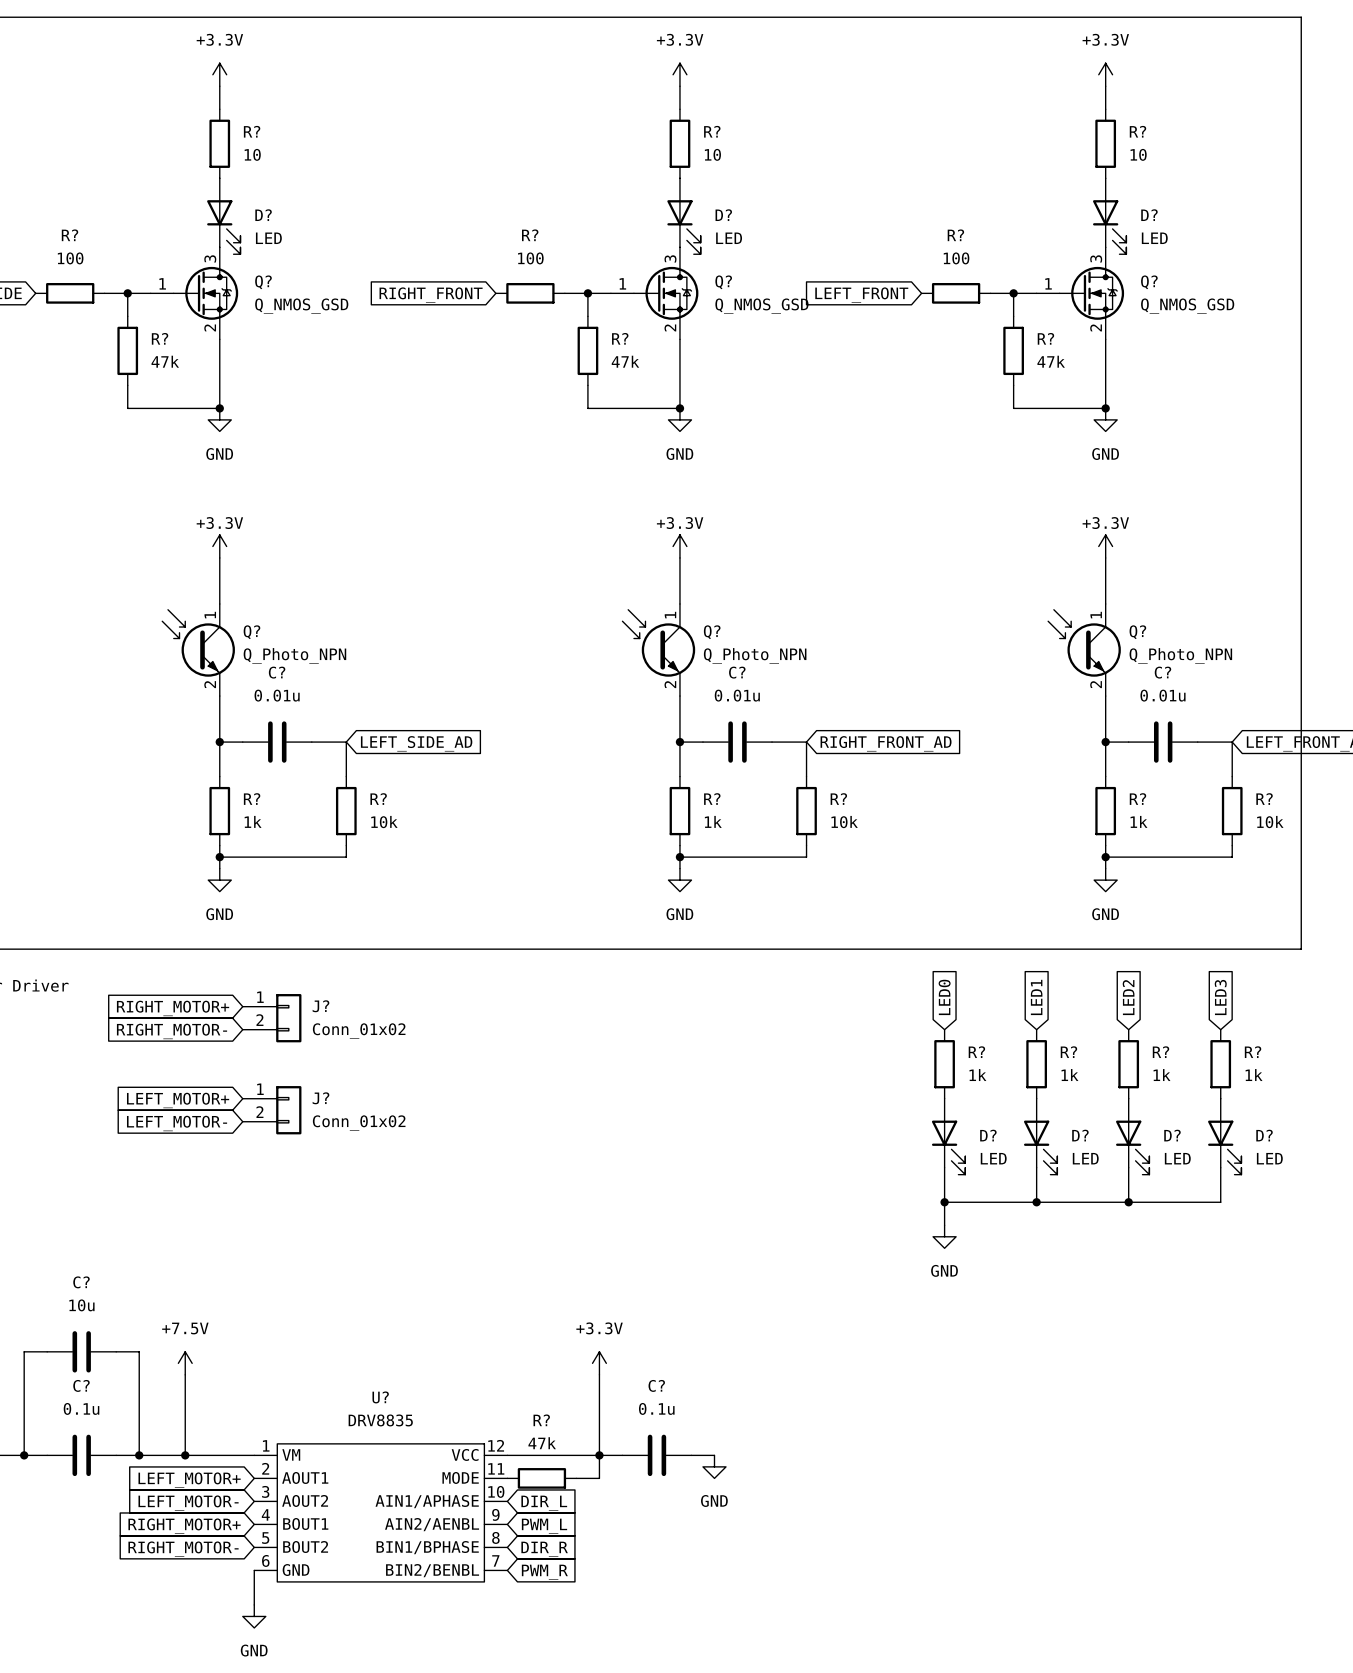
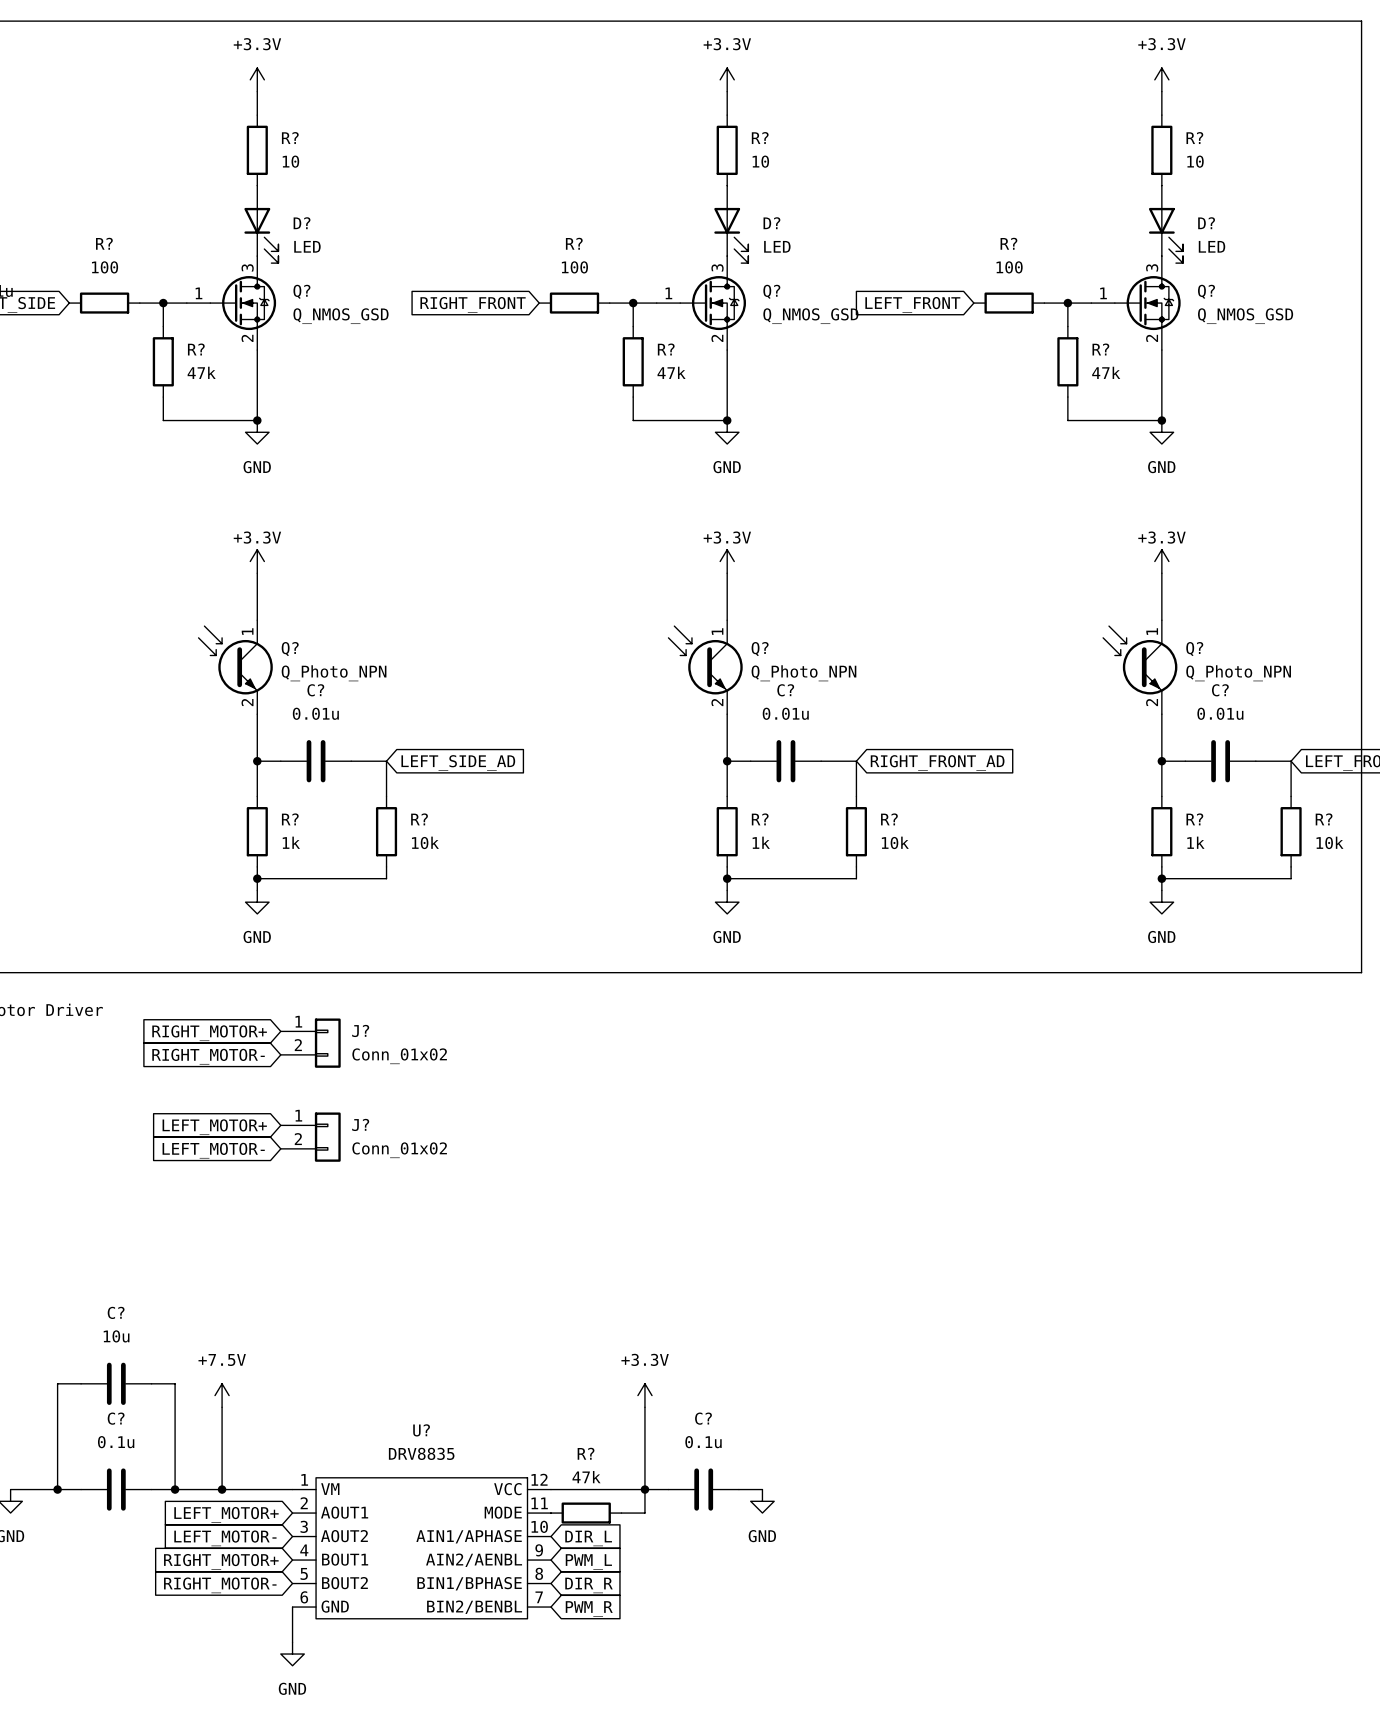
global label: LED0 (944, 997) -> none
global label: LED1 (1036, 997) -> none
global label: LED2 (1128, 997) -> none
global label: LED3 (1220, 997) -> none
R?: 1k (944, 1064) -> none
R?: 1k (1036, 1064) -> none
R?: 1k (1128, 1064) -> none
R?: 1k (1220, 1064) -> none
D?: LED (948, 1136) -> none
D?: LED (1040, 1136) -> none
D?: LED (1132, 1136) -> none
D?: LED (1224, 1136) -> none
wire: (944, 1167) (944, 1225) -> none
wire: (1036, 1167) (1036, 1202) -> none
wire: (1128, 1167) (1128, 1202) -> none
wire: (1220, 1167) (1220, 1202) (944, 1202) -> none
junction: (944, 1202) -> none
junction: (1036, 1202) -> none
junction: (1128, 1202) -> none
power symbol: GND (944, 1236) -> none

